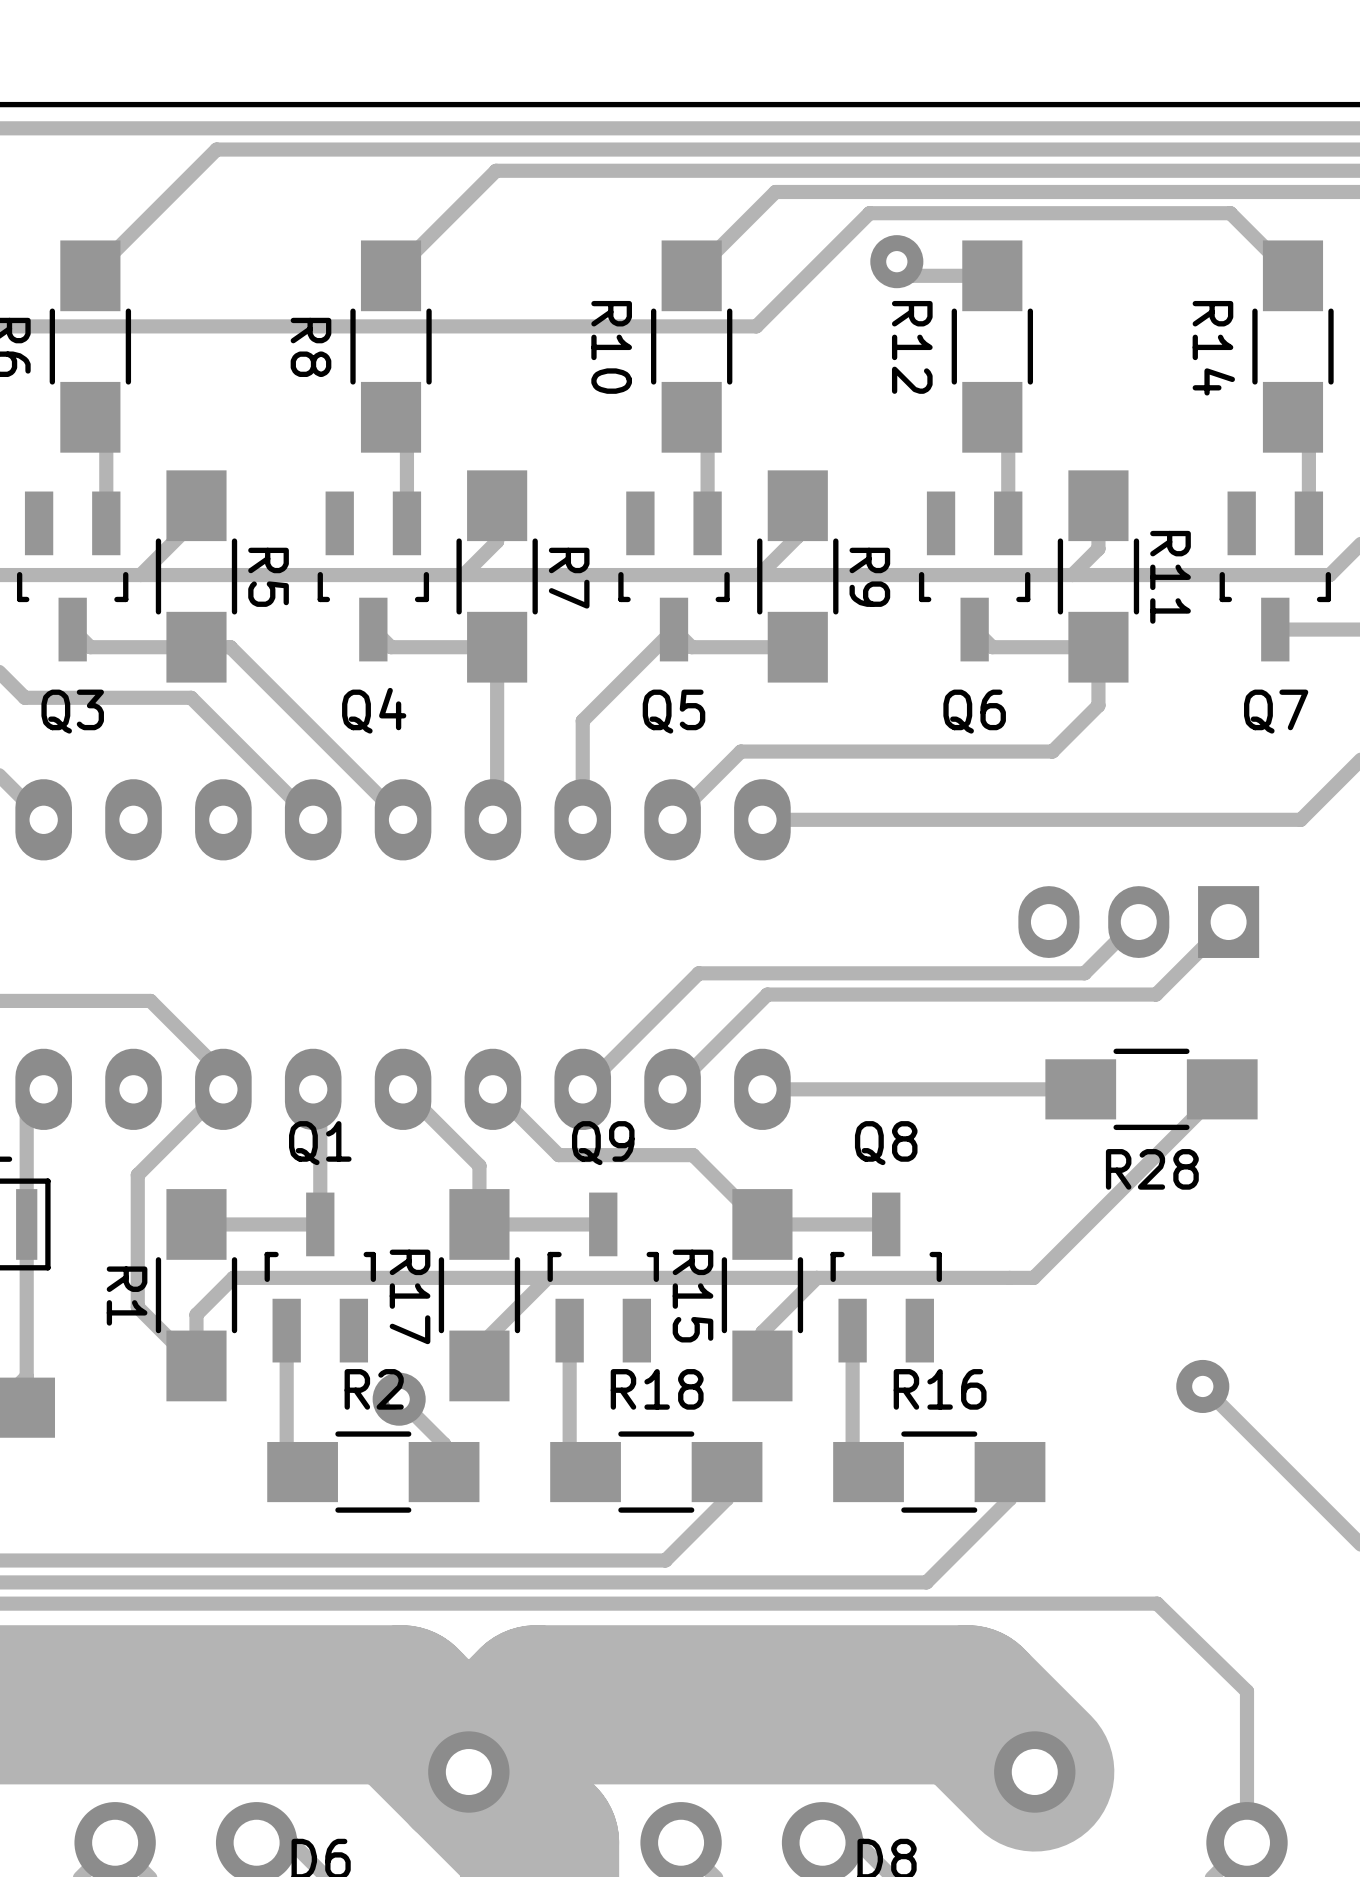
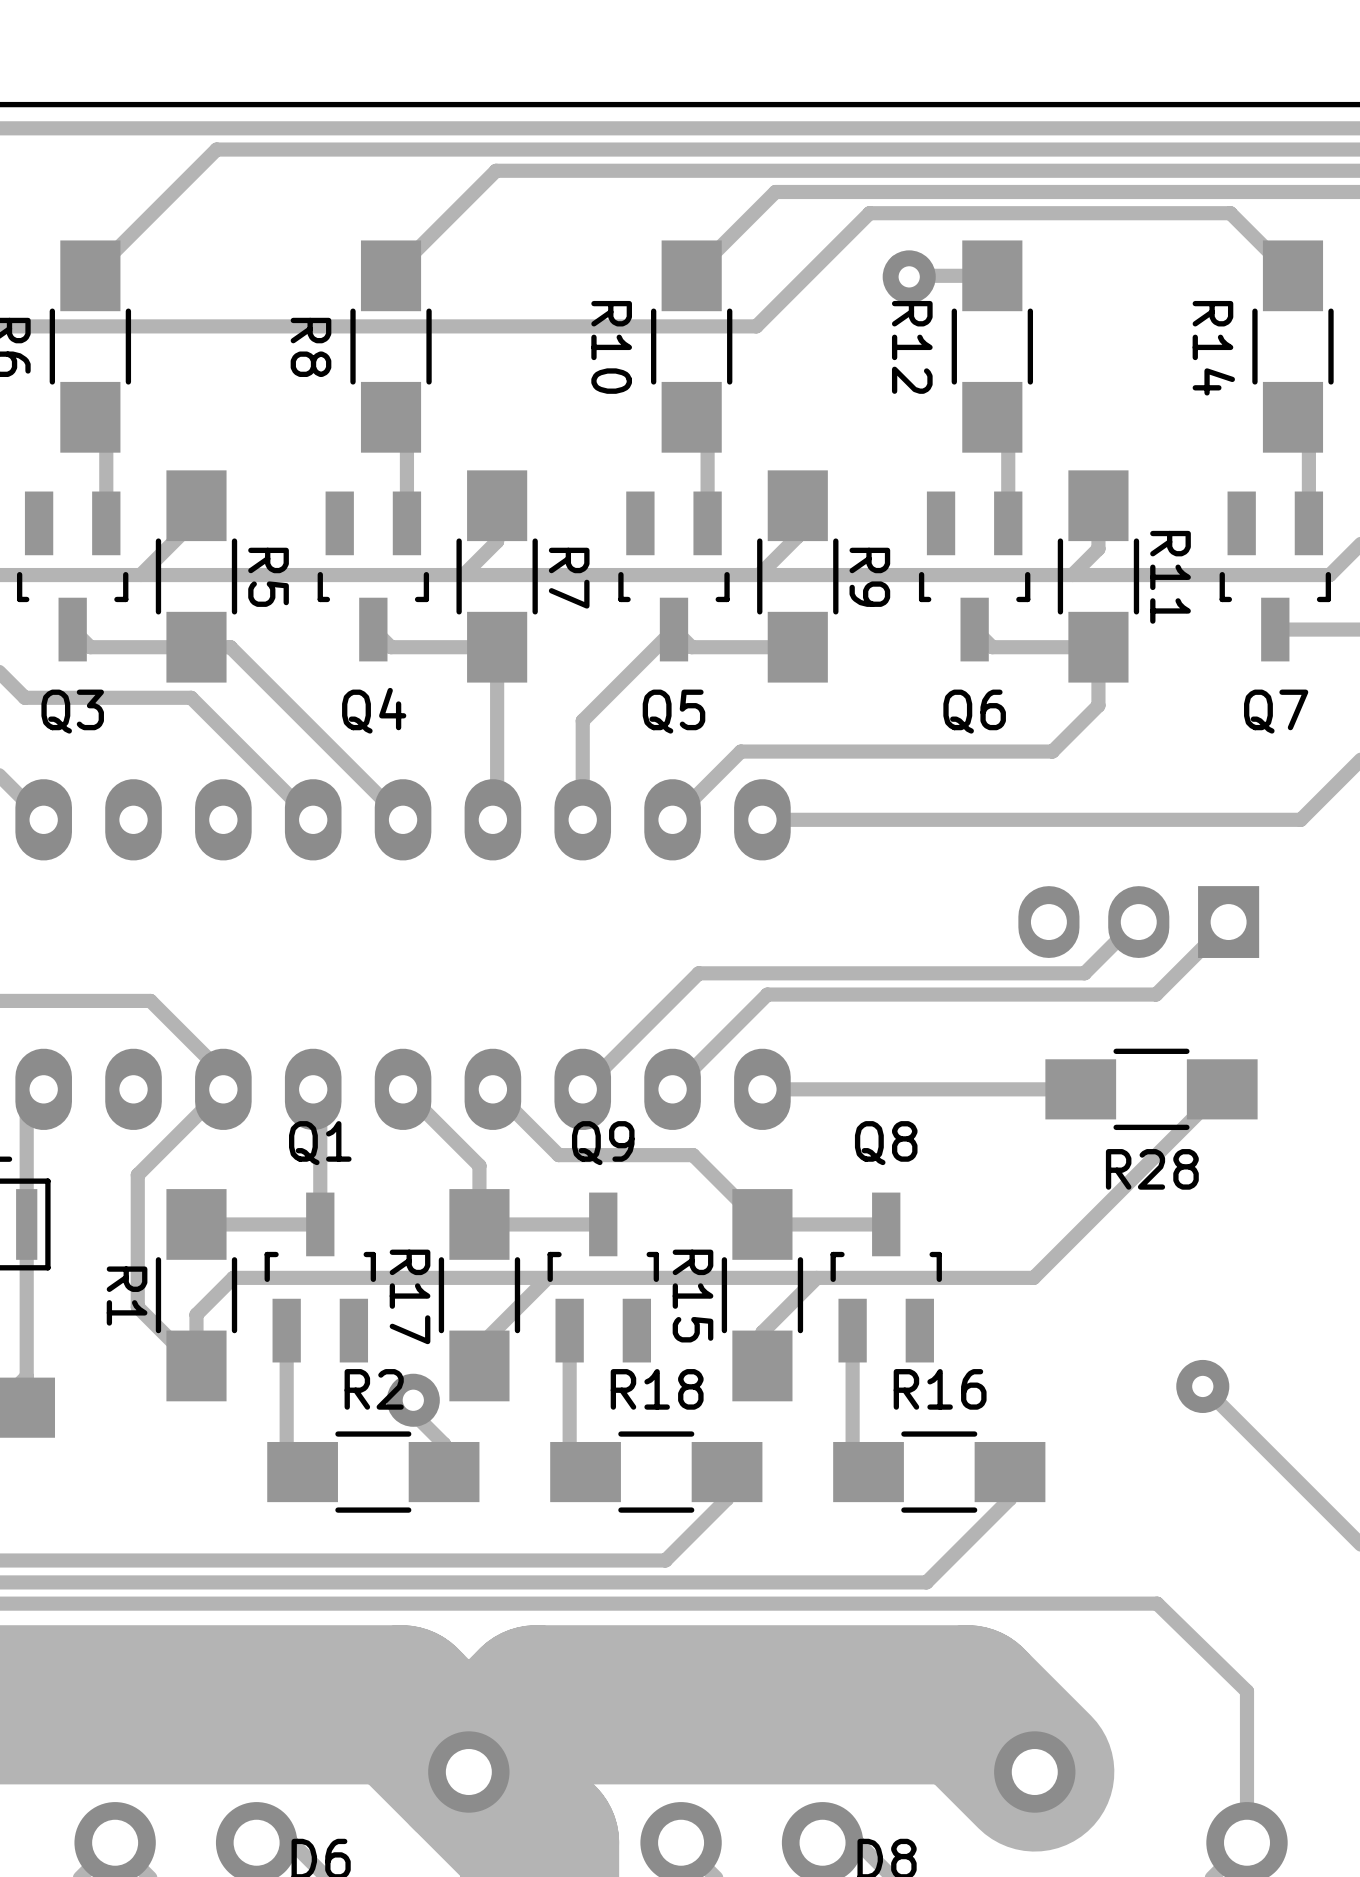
via position: (896, 261) -> (909, 276)
via position: (399, 1399) -> (413, 1400)

